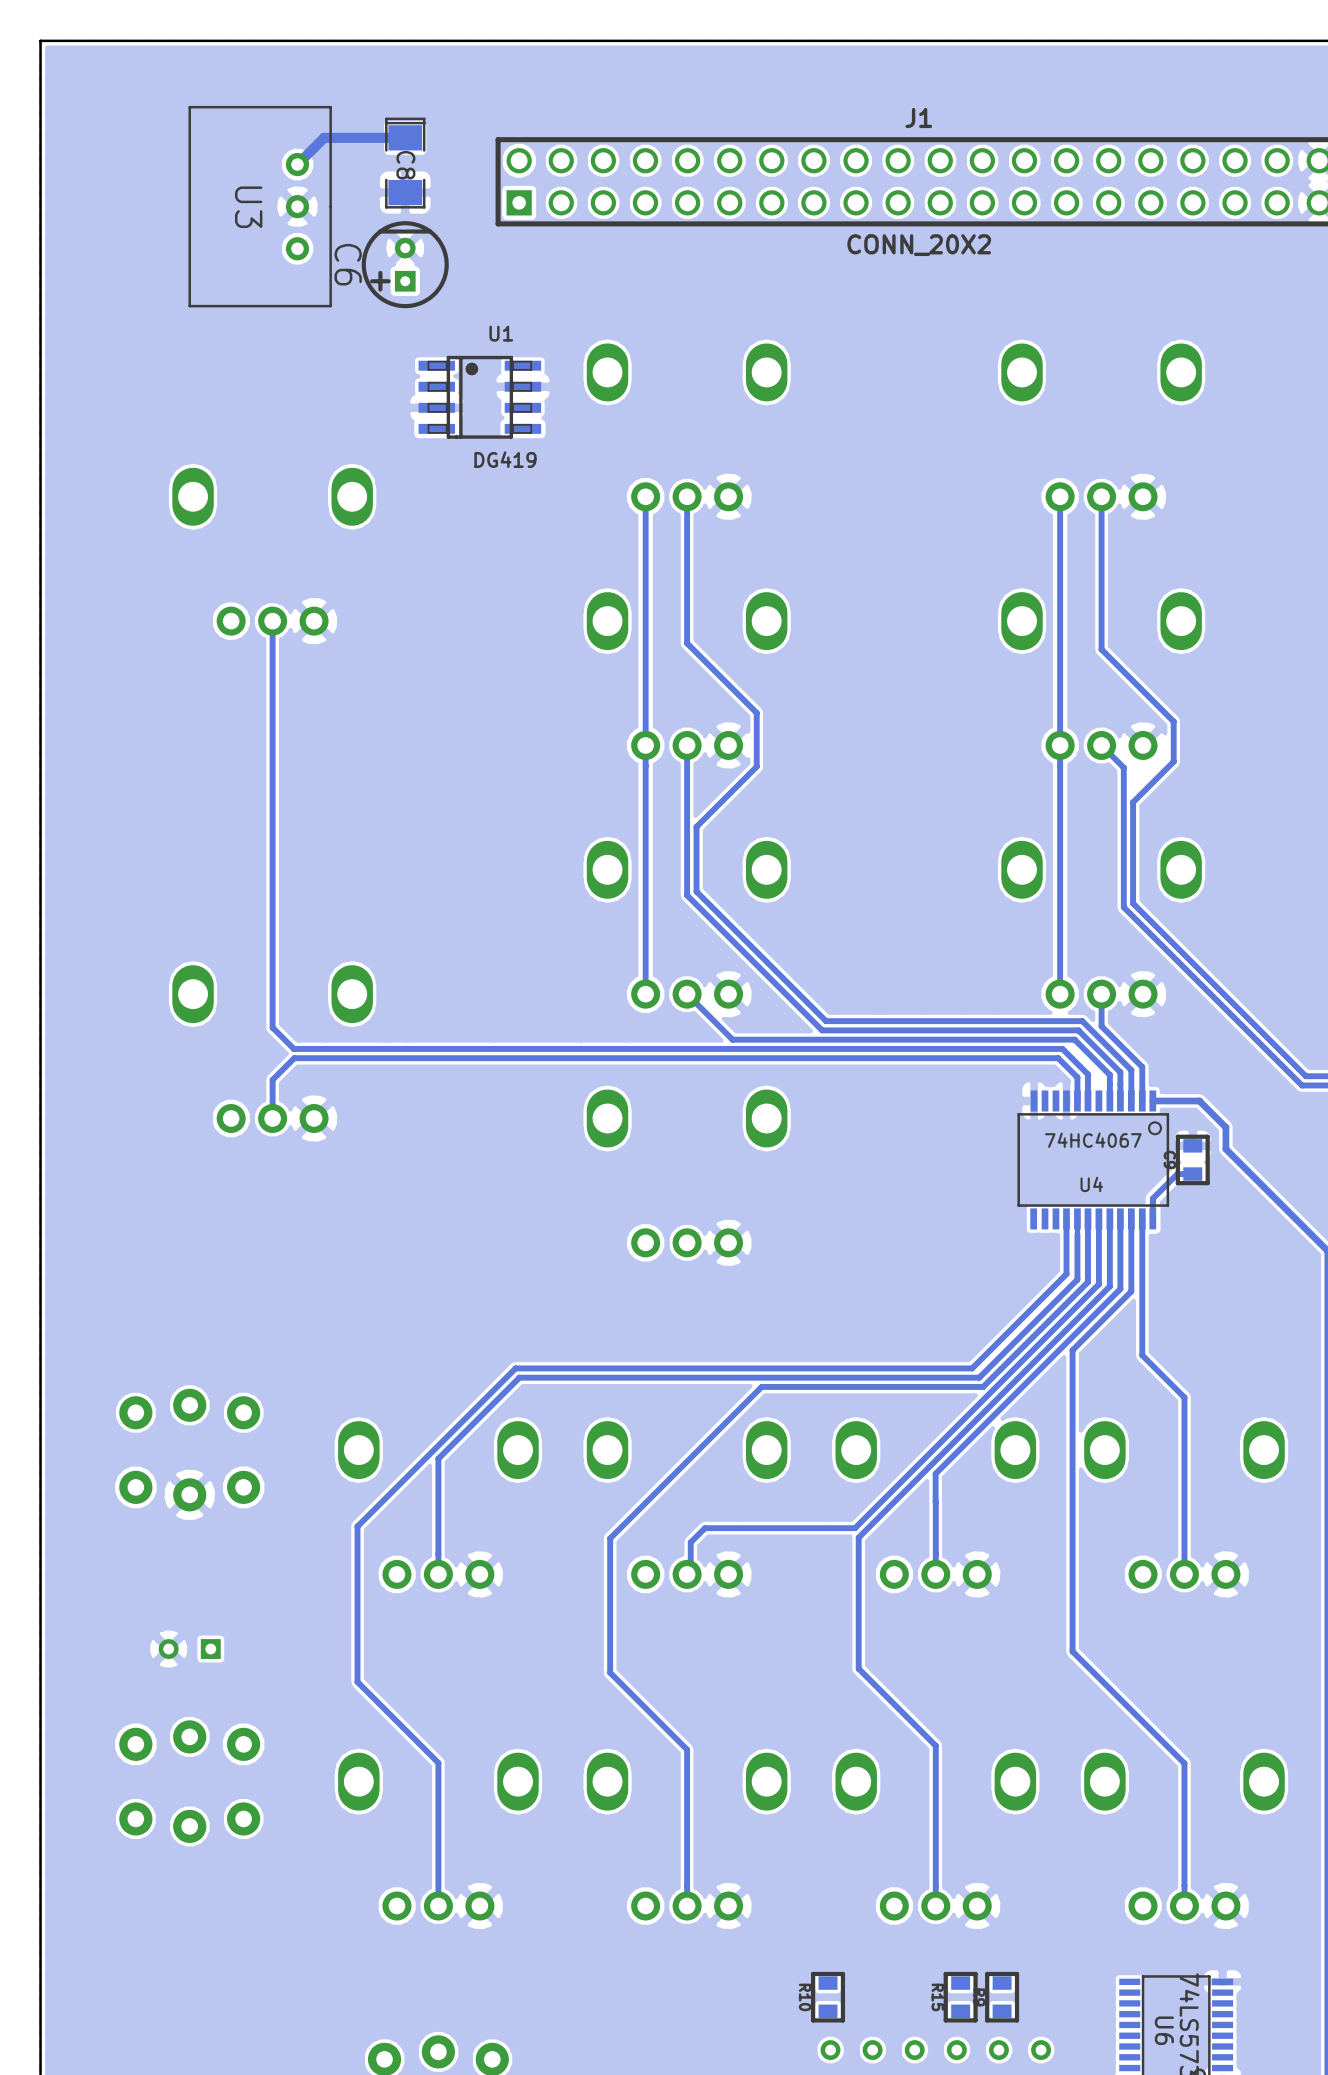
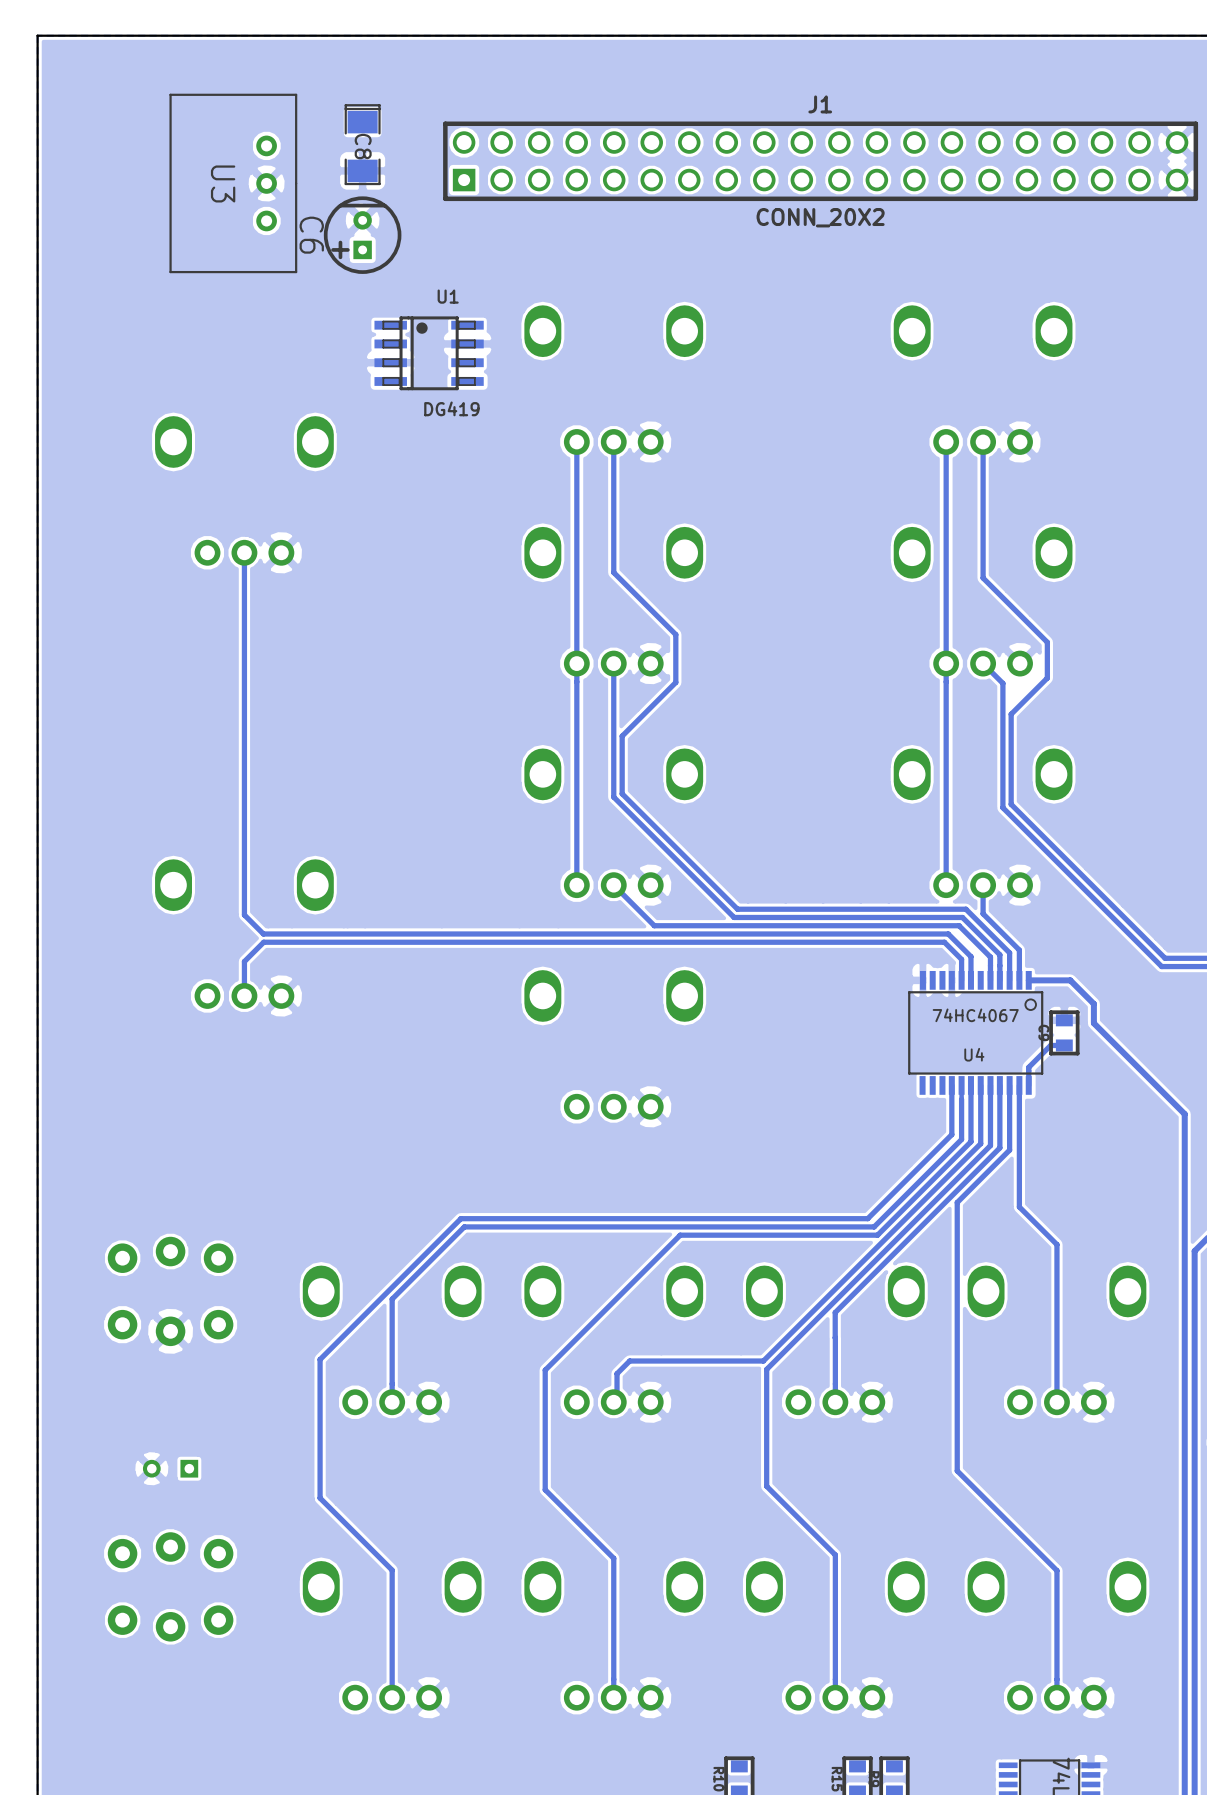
track: (405, 137) (324, 137) (297, 164) -> none

